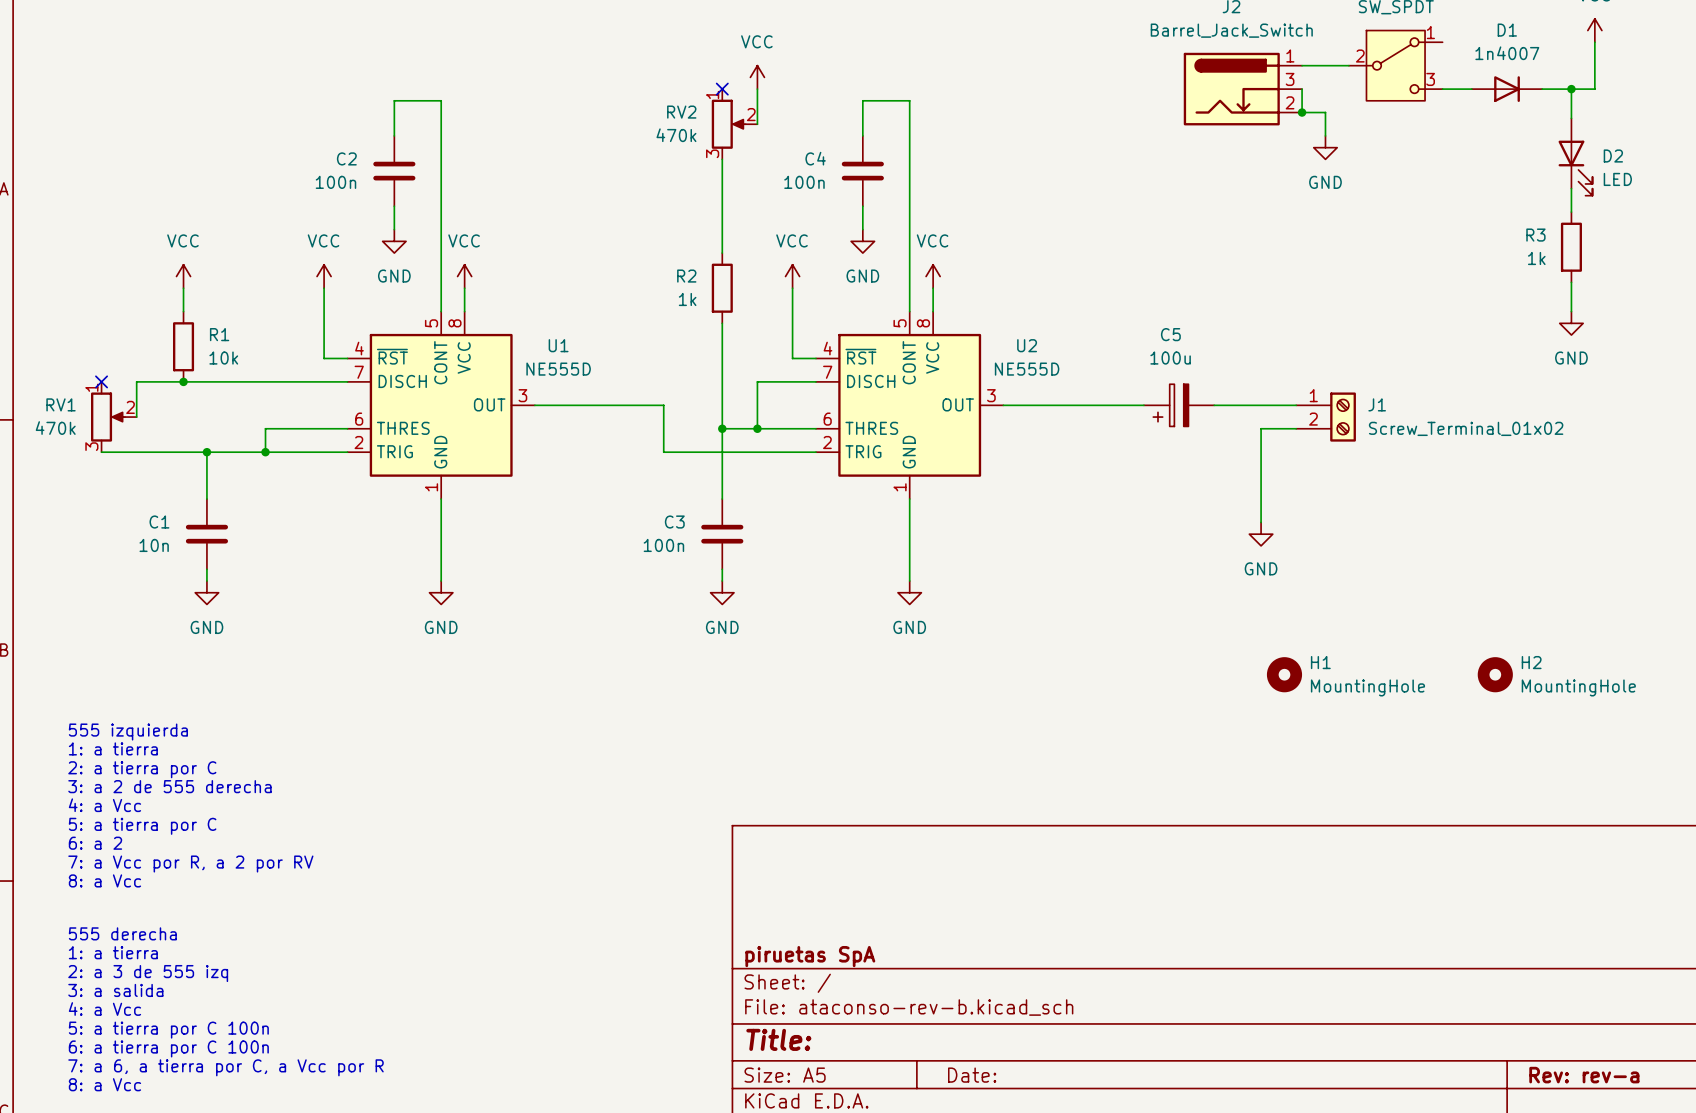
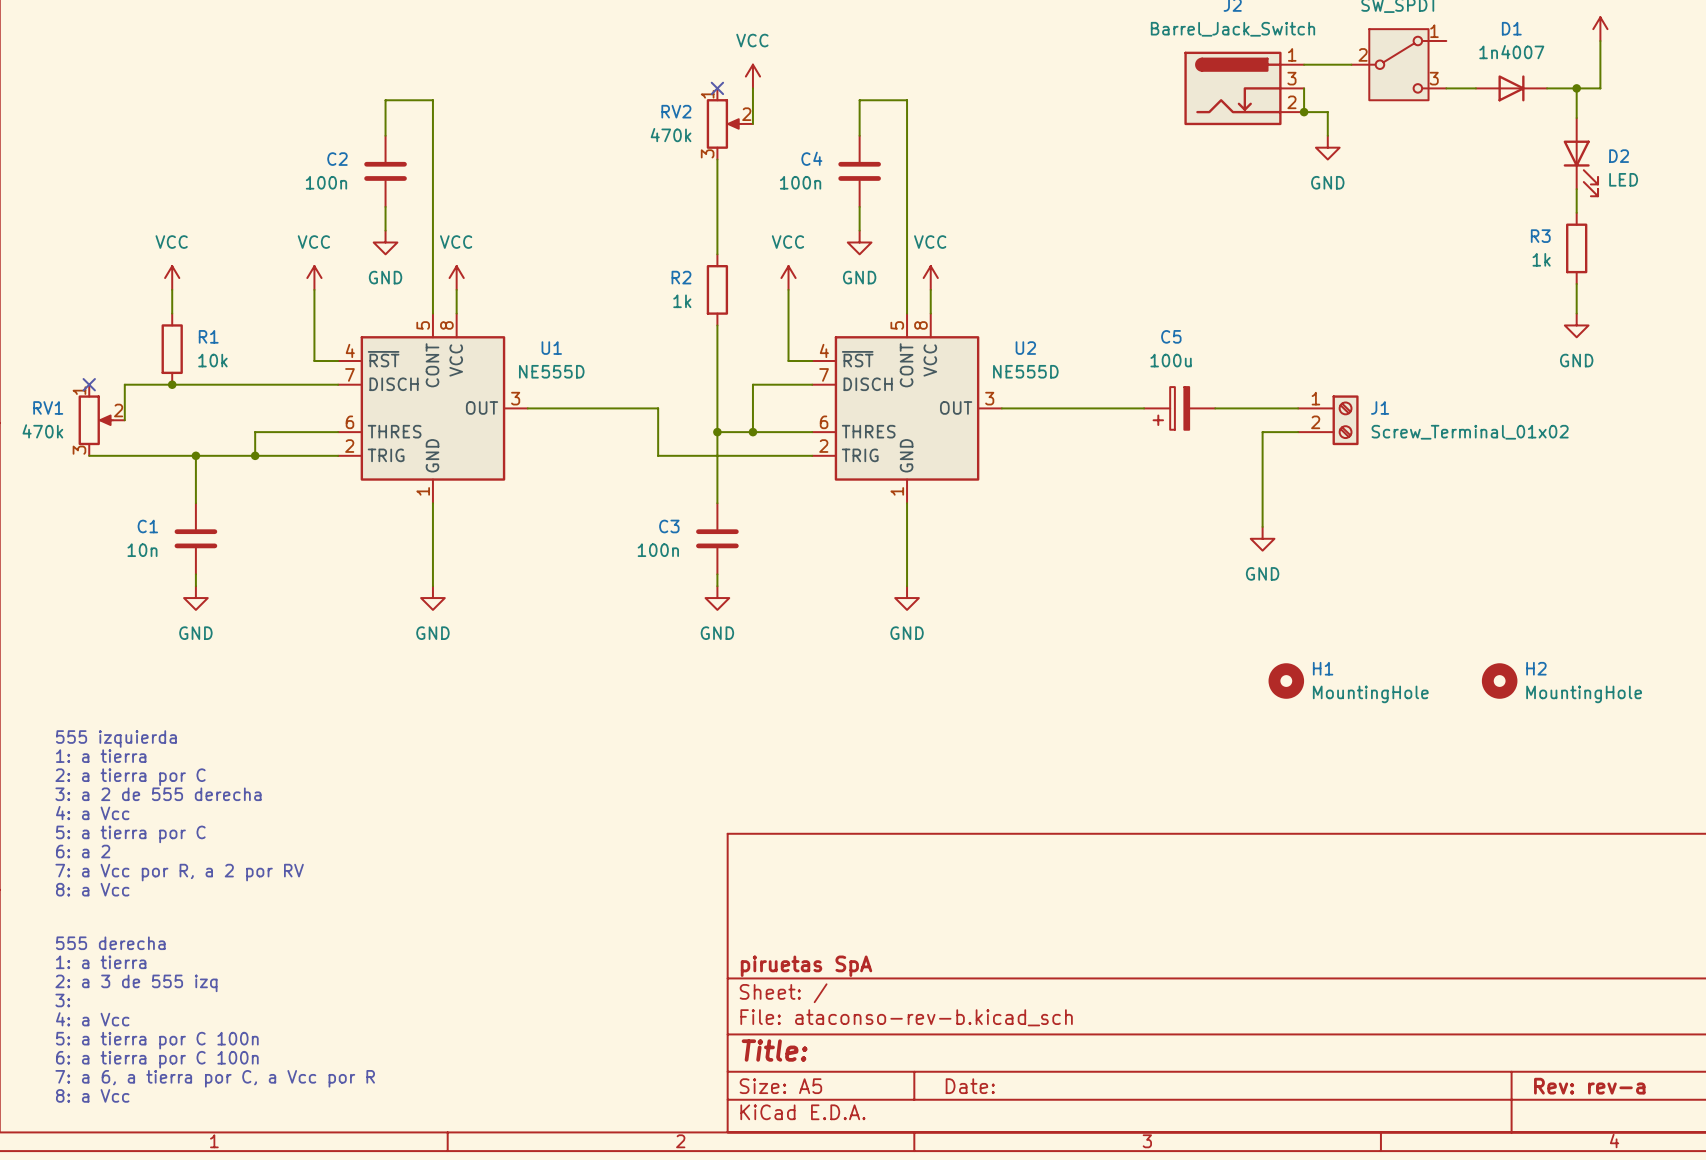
text: 3: a salida (115, 990) -> 3: (62, 1000)

